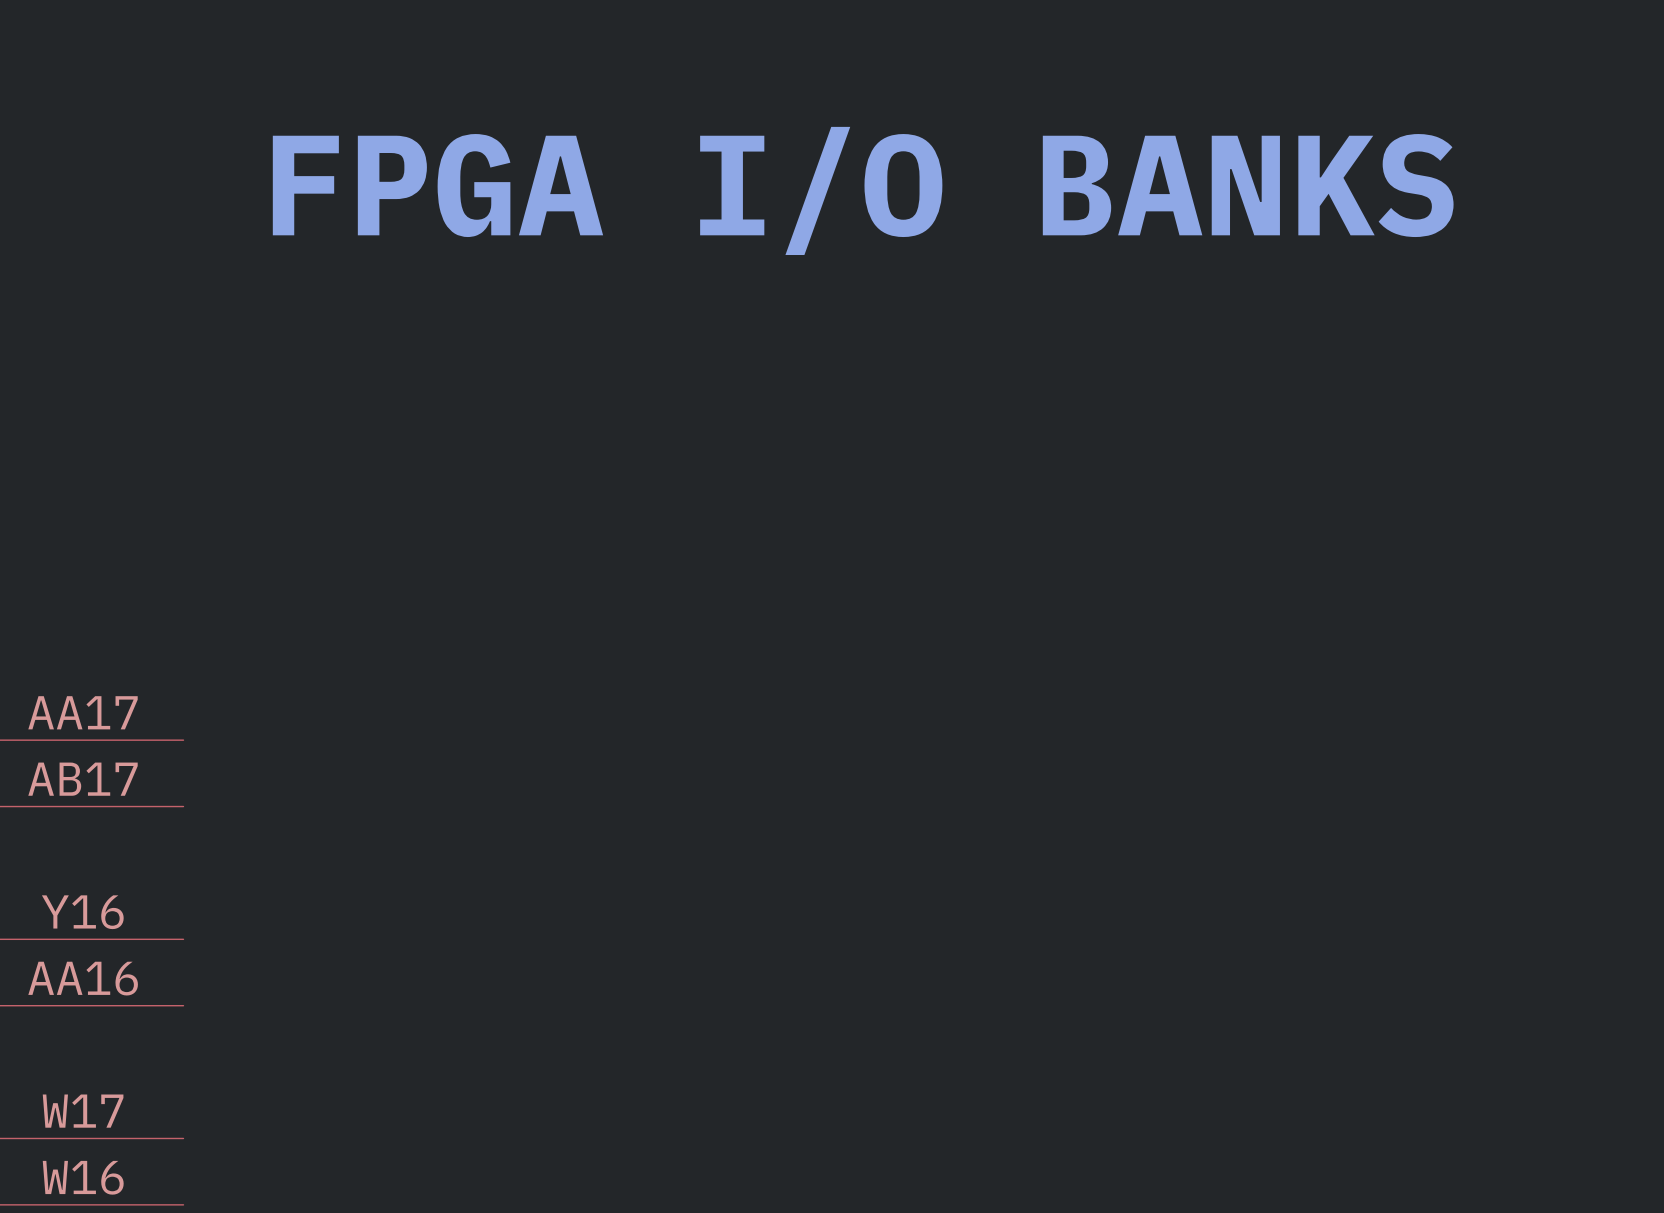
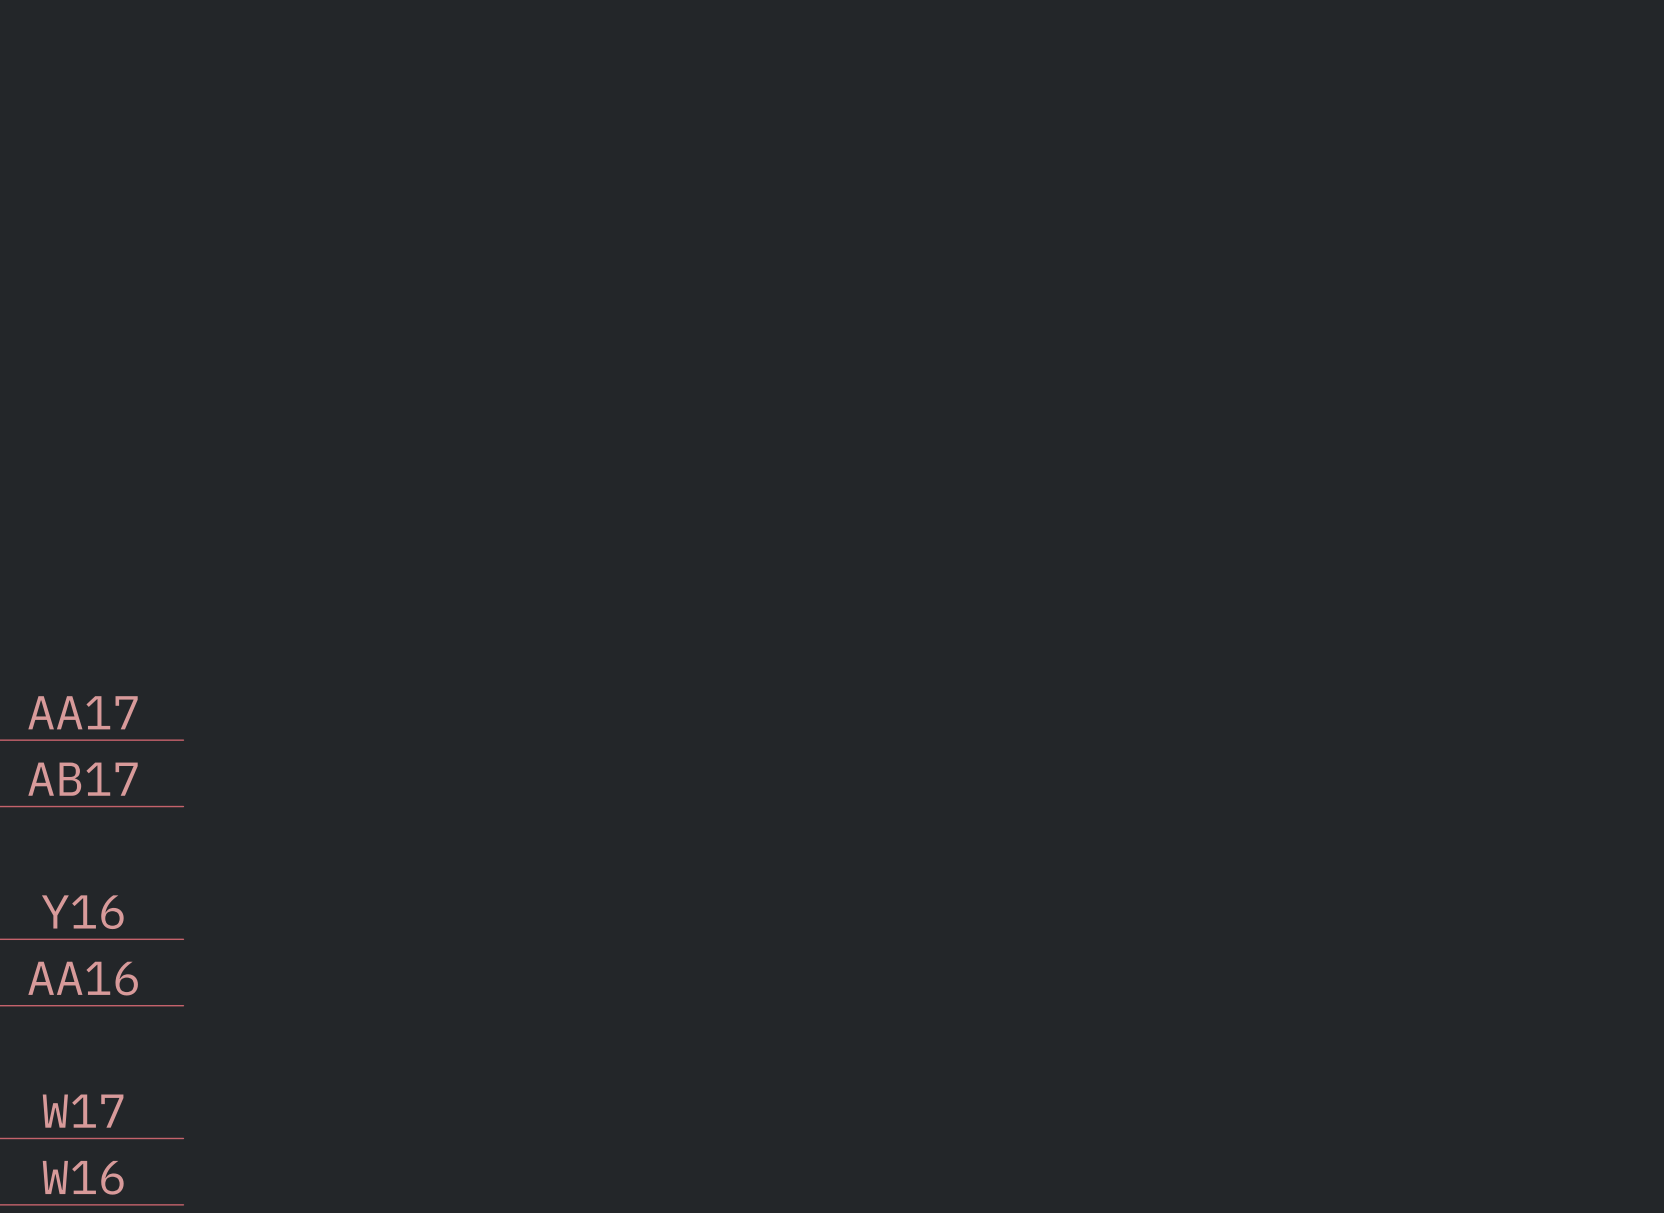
text: FPGA I/O BANKS (863, 190) -> none

